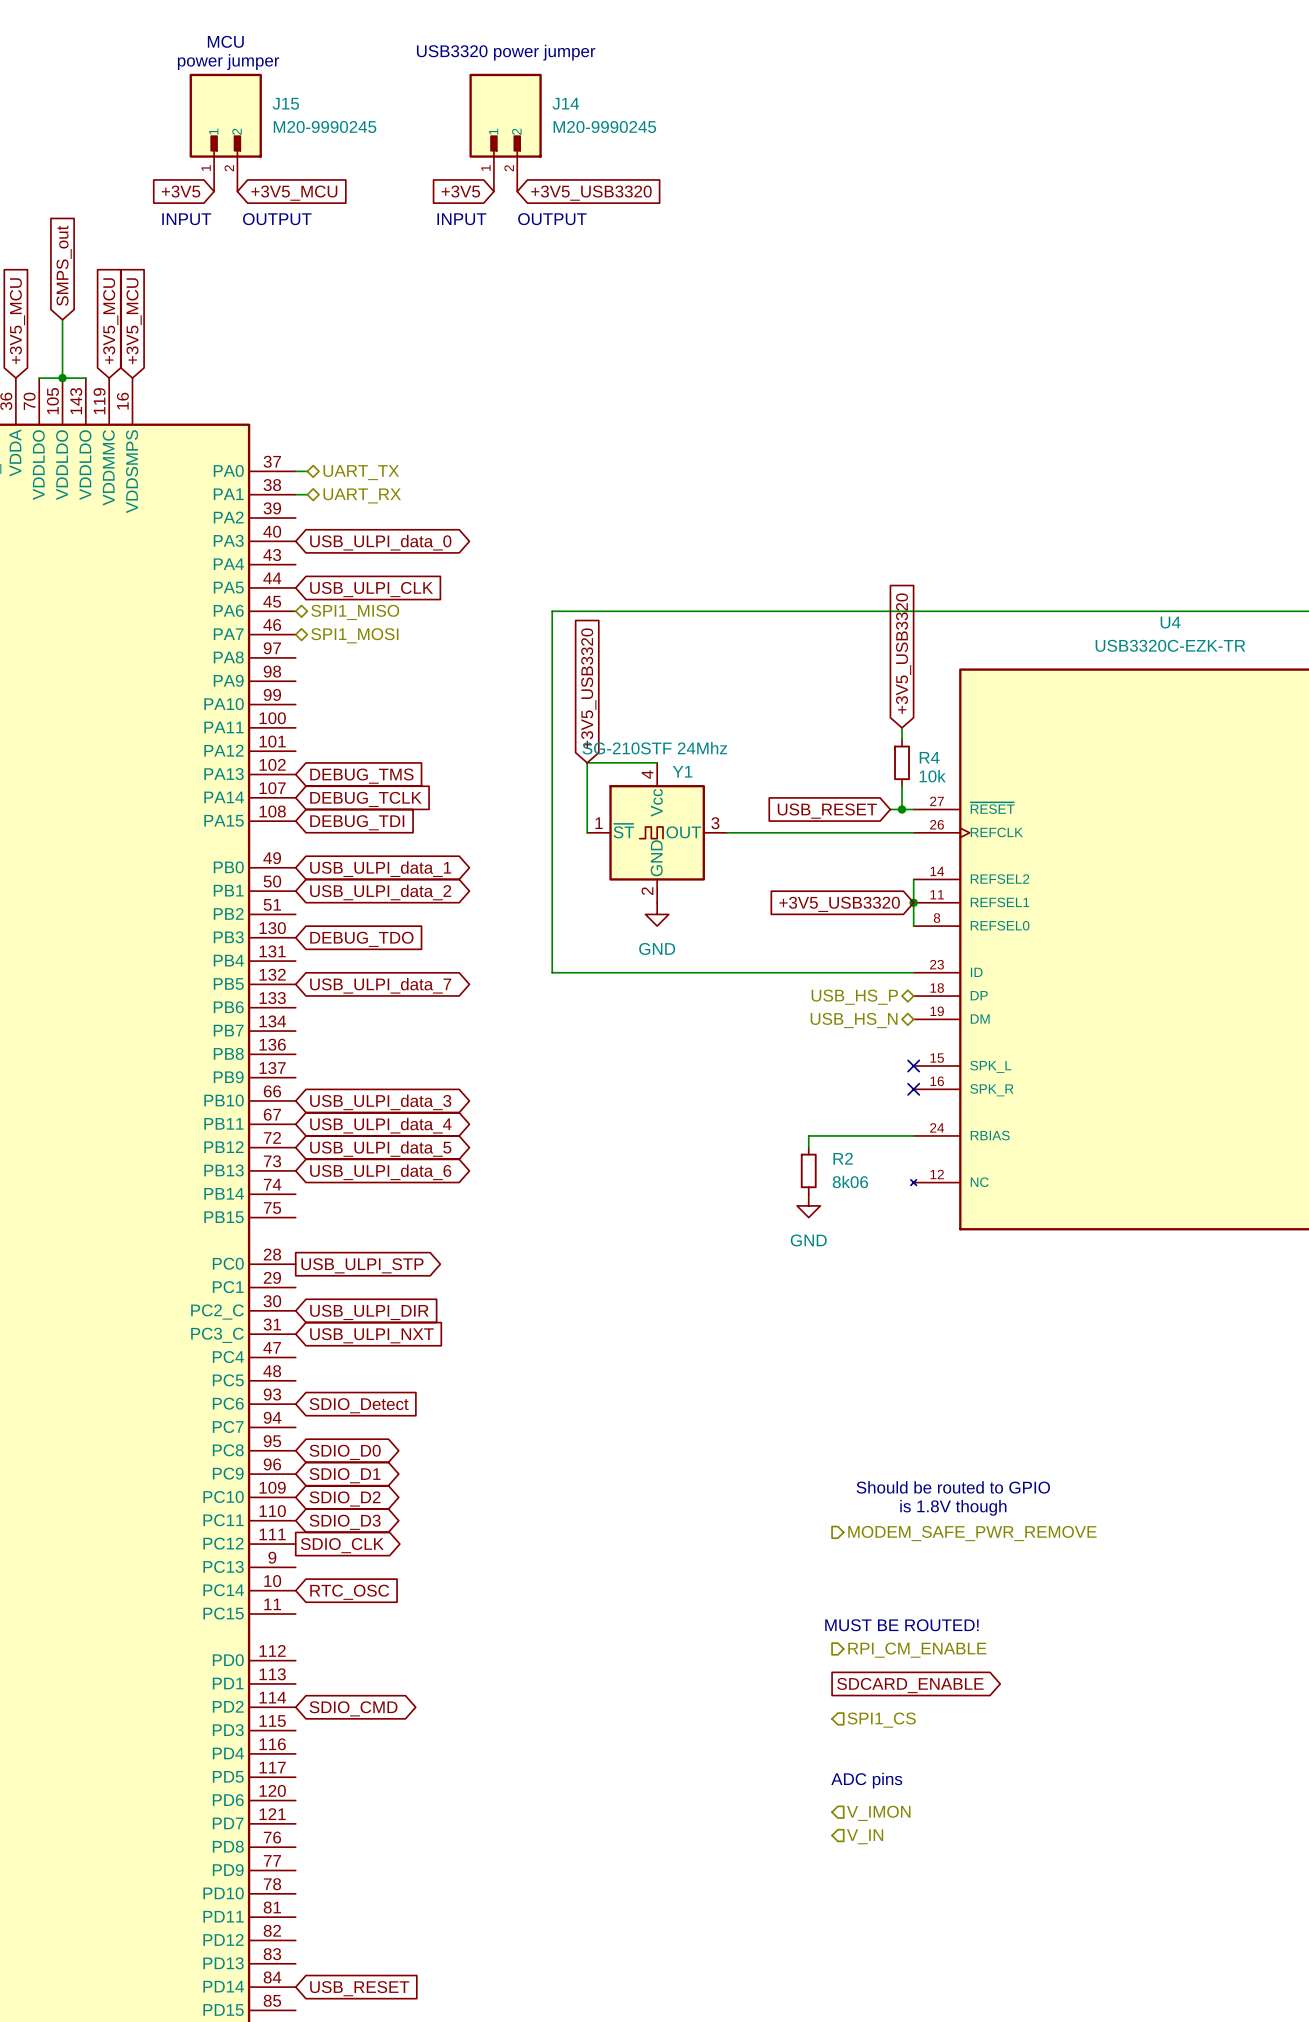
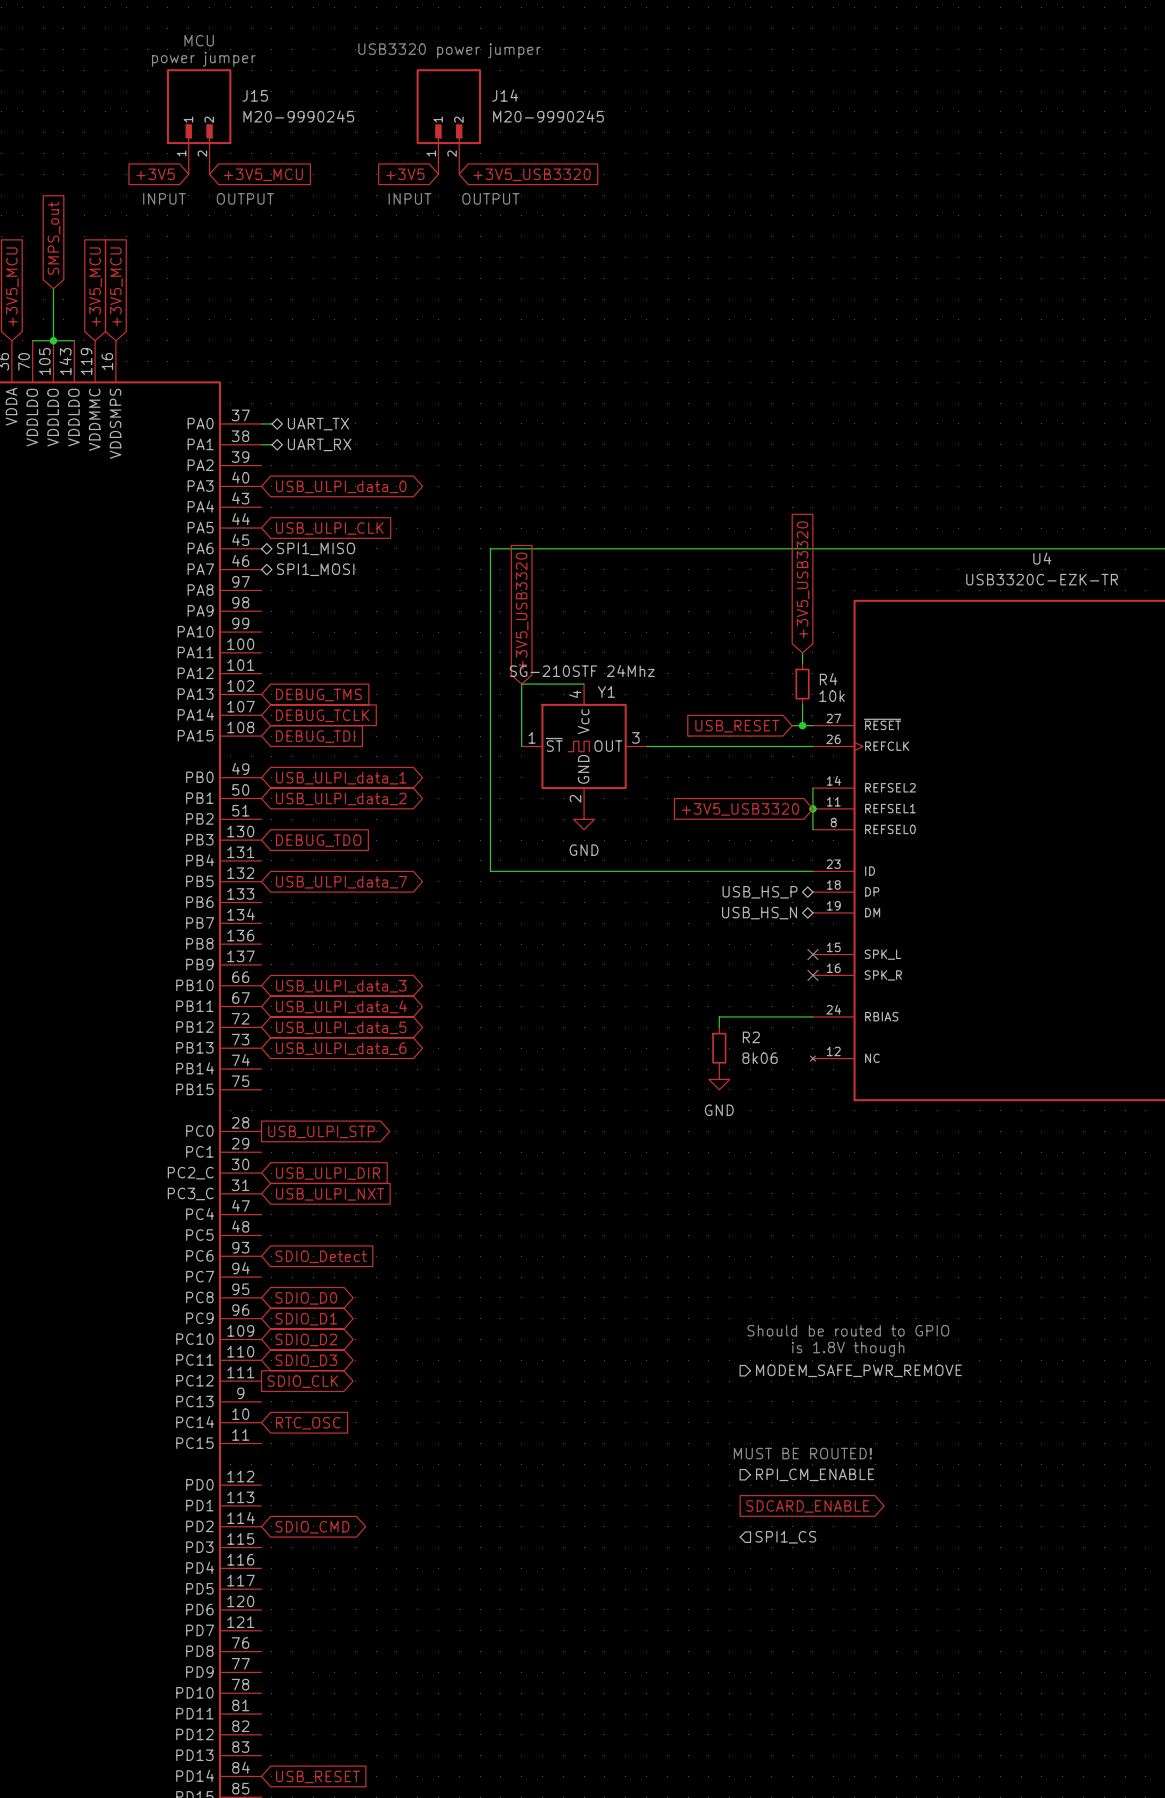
text: ADC pins (866, 1780) -> none
hierarchical label: V_IMON (878, 1813) -> none
hierarchical label: V_IN (865, 1836) -> none

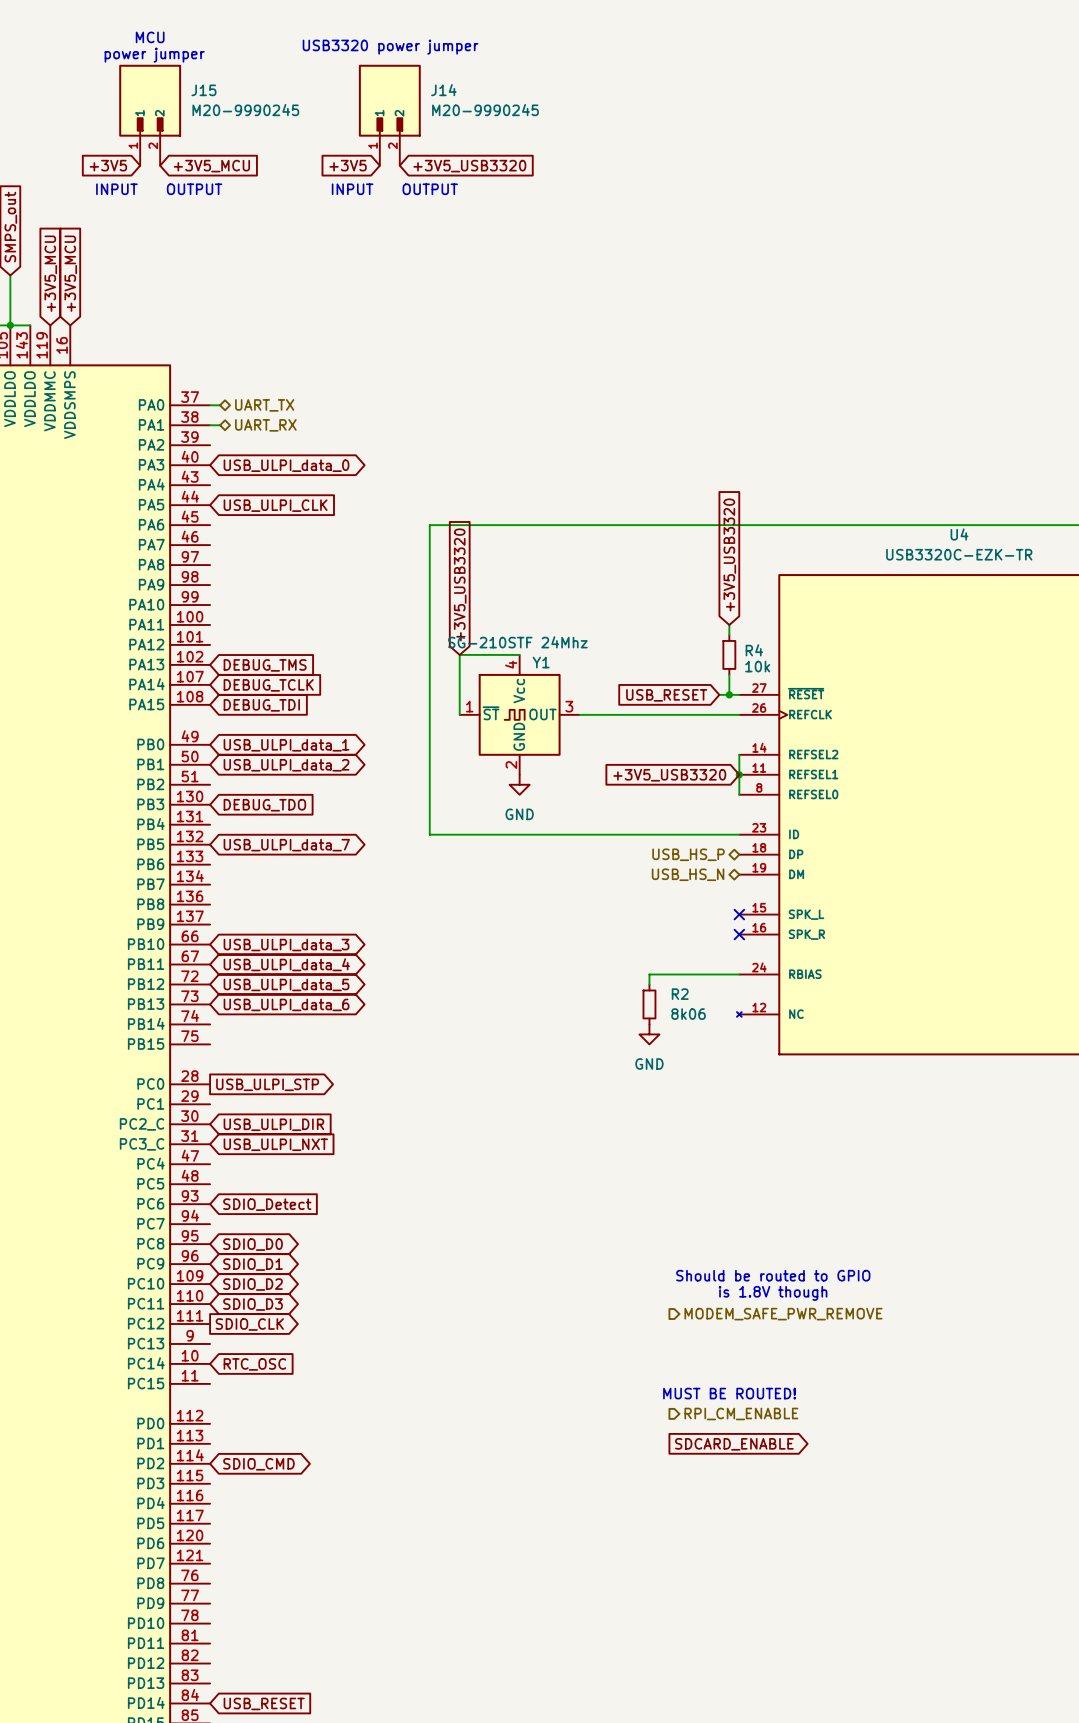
hierarchical label: SPI1_MISO (315, 548) -> none
hierarchical label: SPI1_MOSI (315, 569) -> none
hierarchical label: SPI1_CS (785, 1537) -> none

